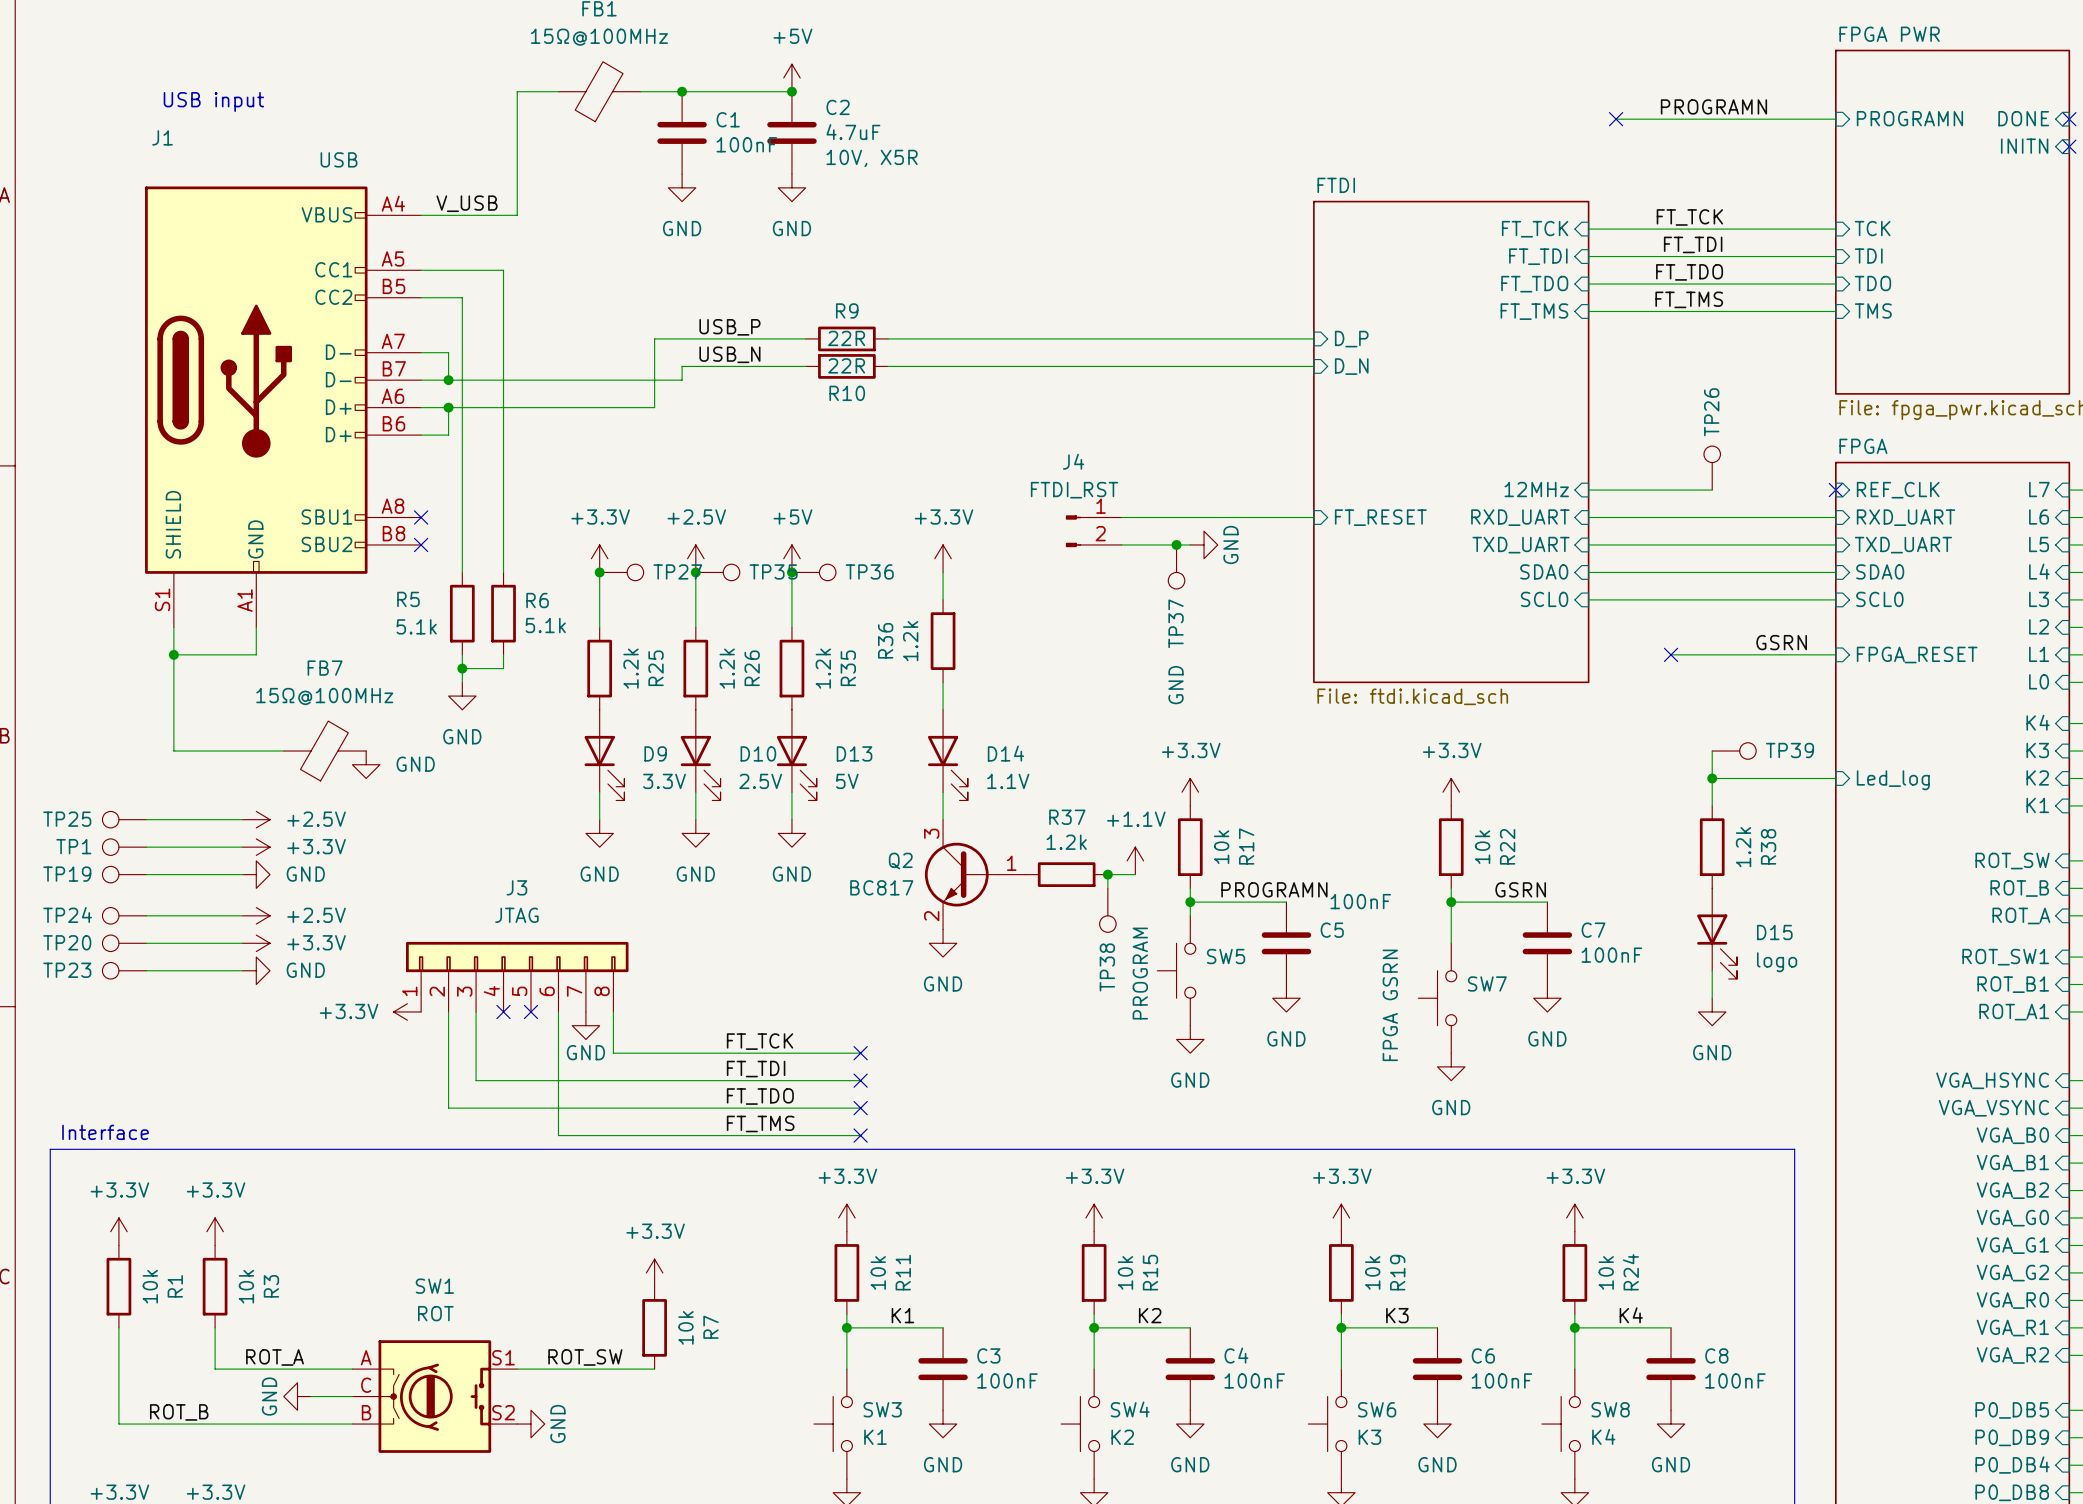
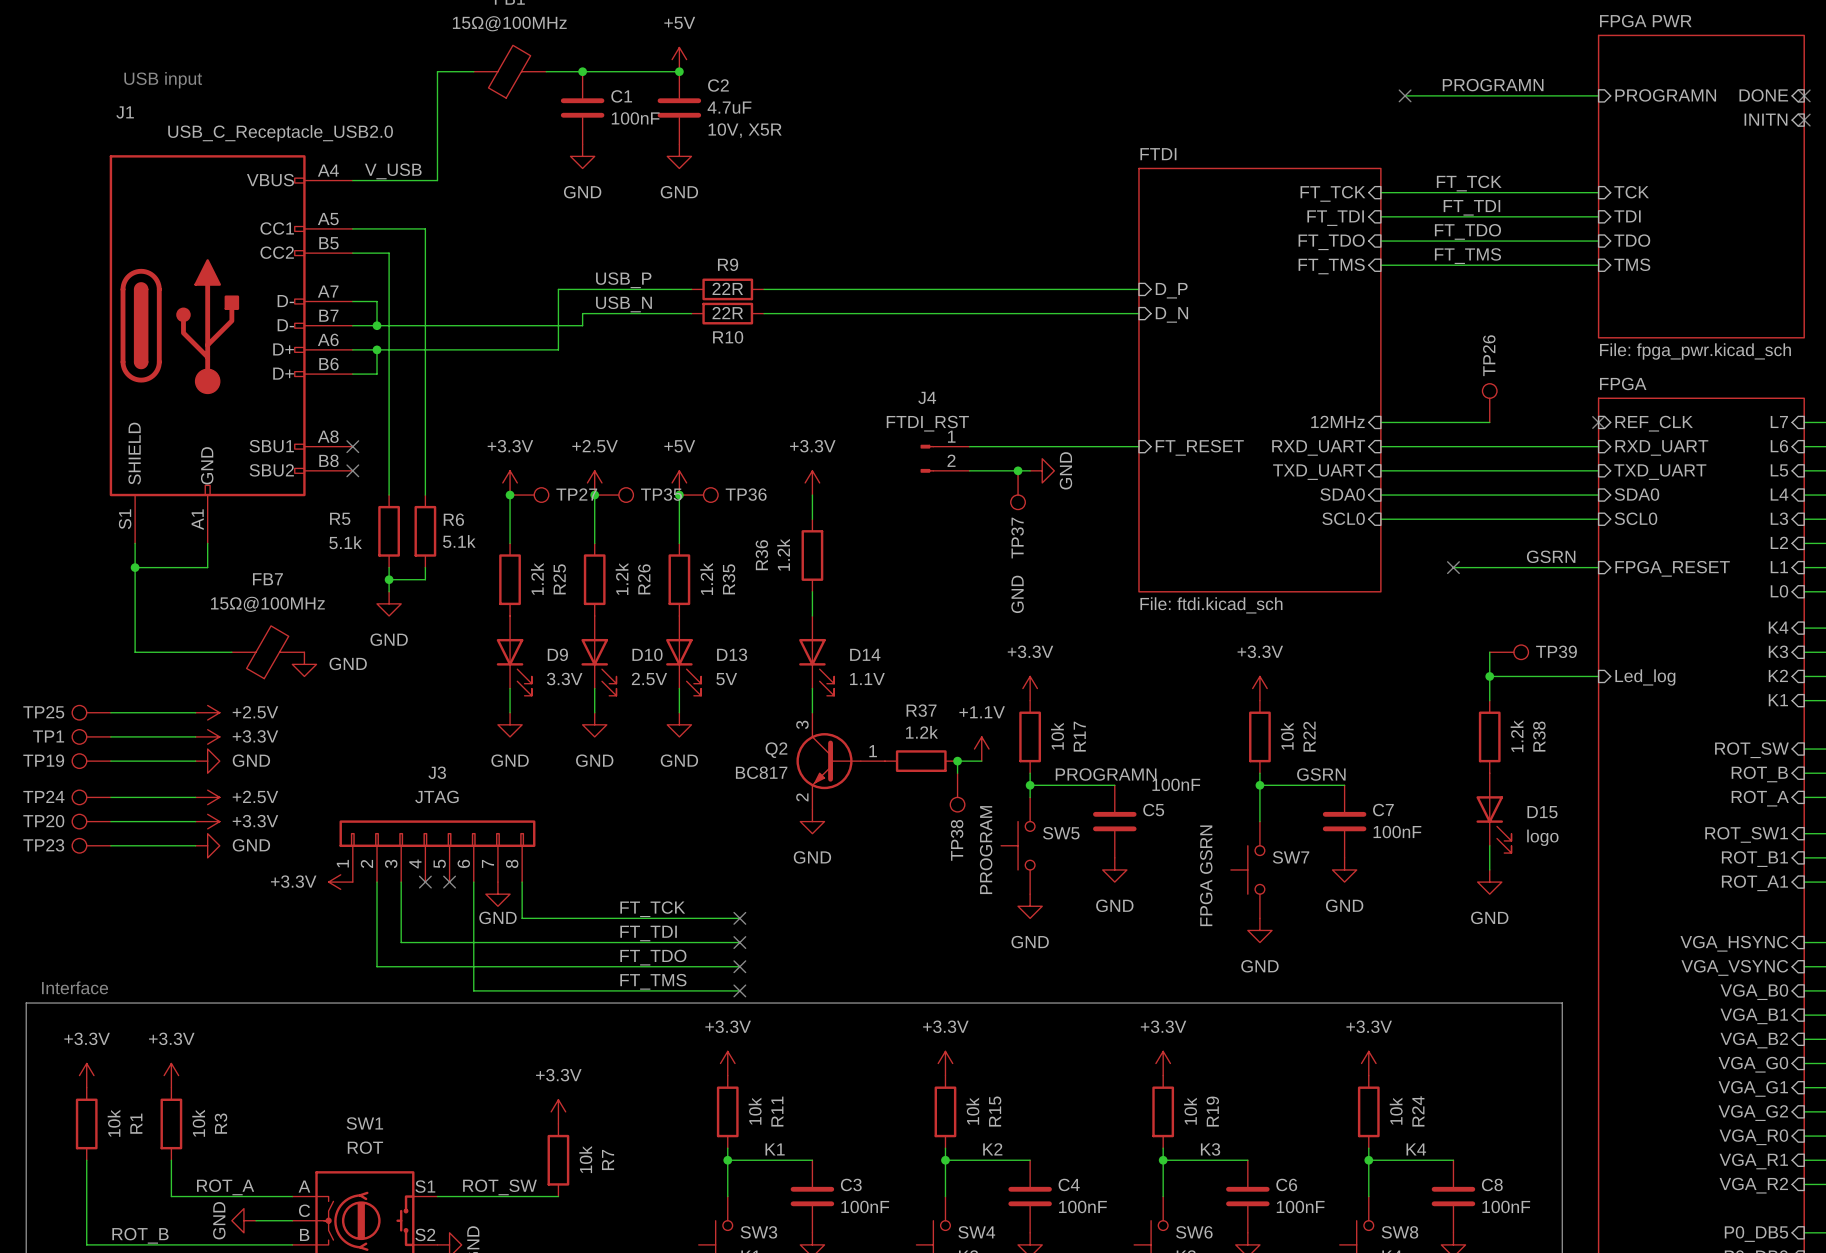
J1 value: USB (339, 159) -> USB_C_Receptacle_USB2.0 (280, 133)

